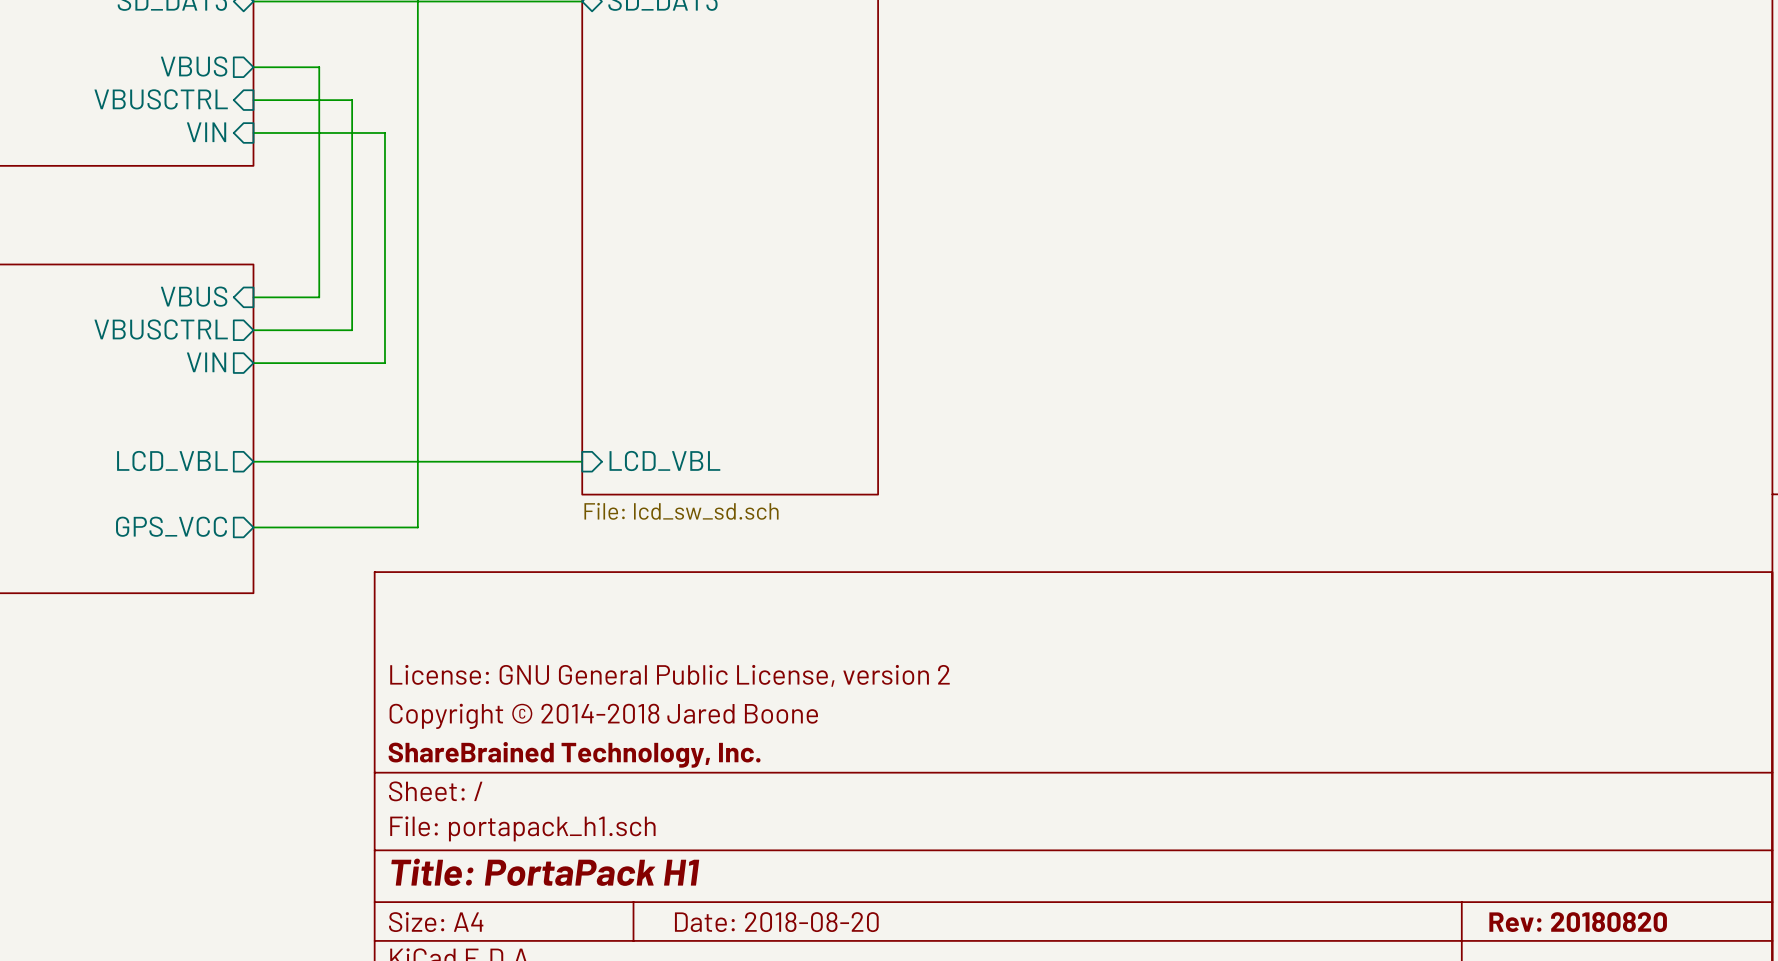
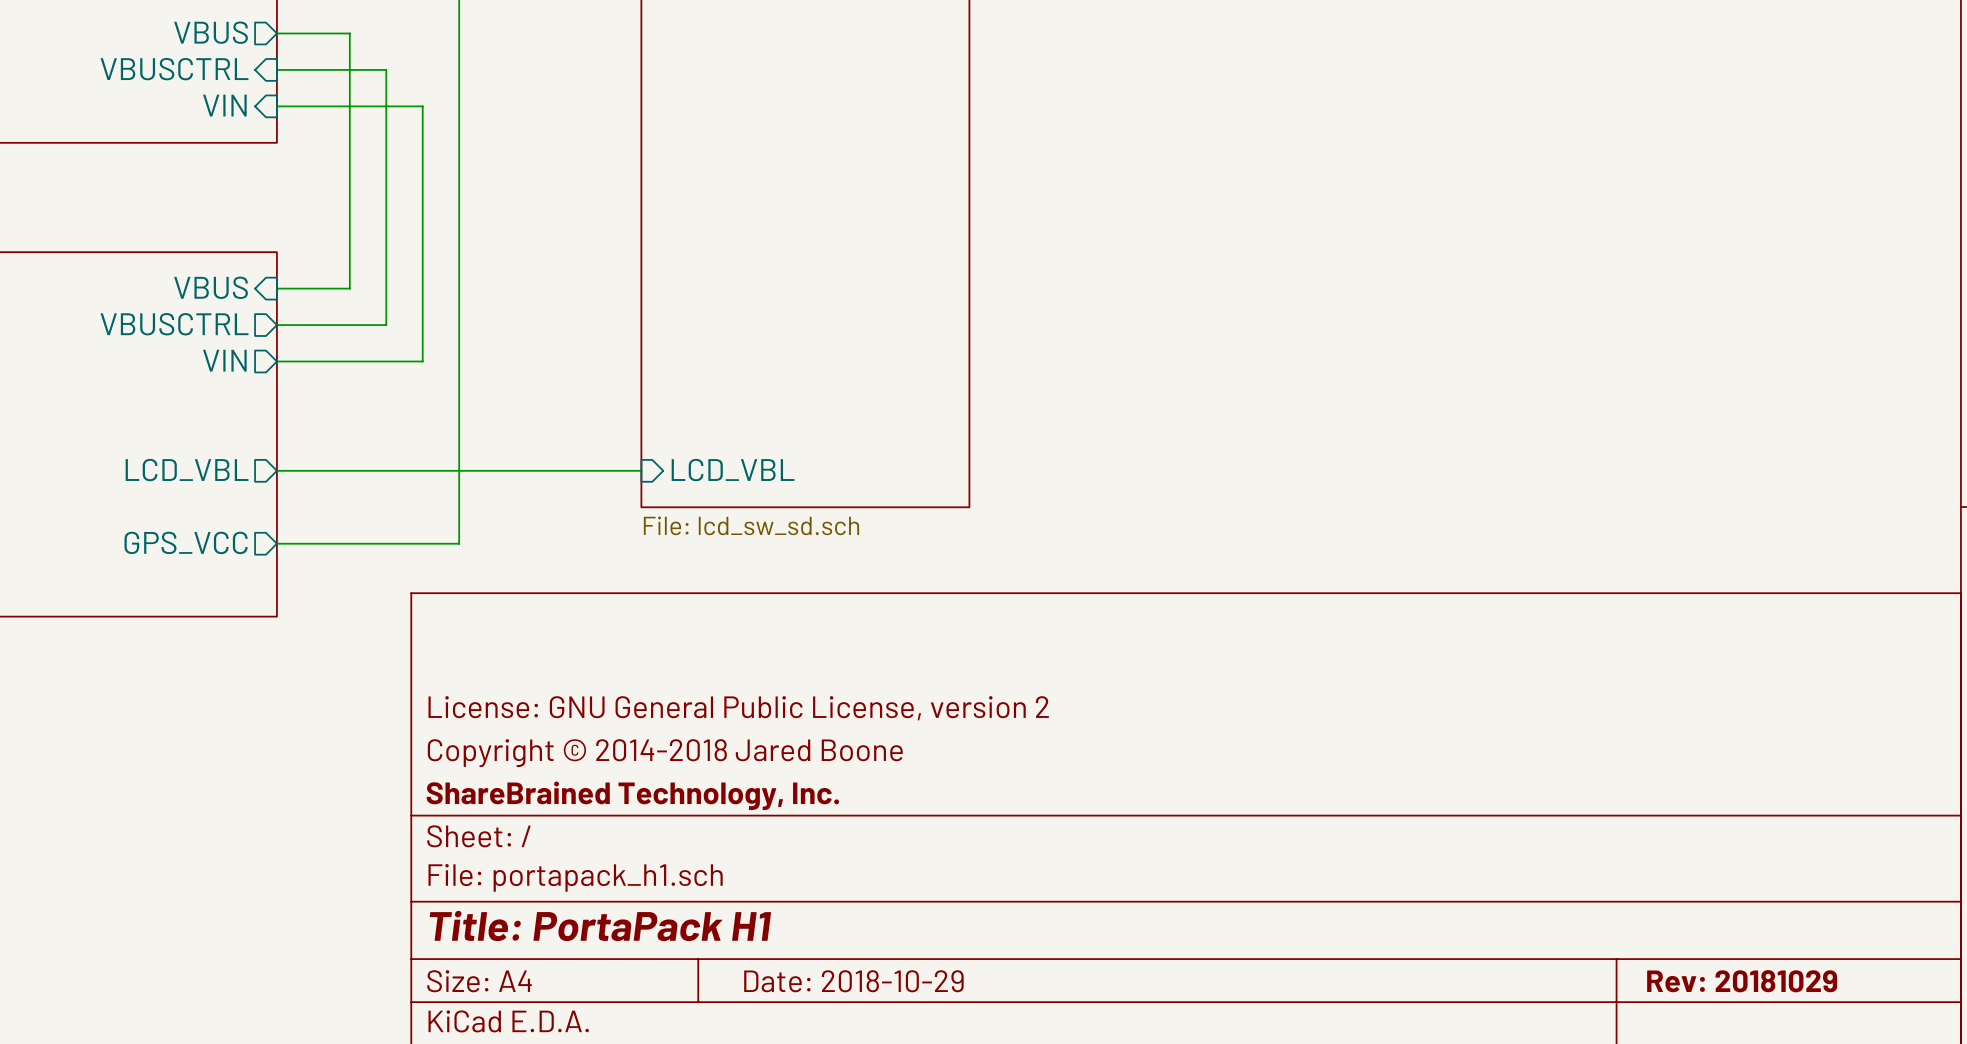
title block: Date: 2018-08-20 (776, 922) -> Date: 2018-10-29 (853, 981)
title block: Rev: 20180820 (1578, 922) -> Rev: 20181029 (1742, 981)

